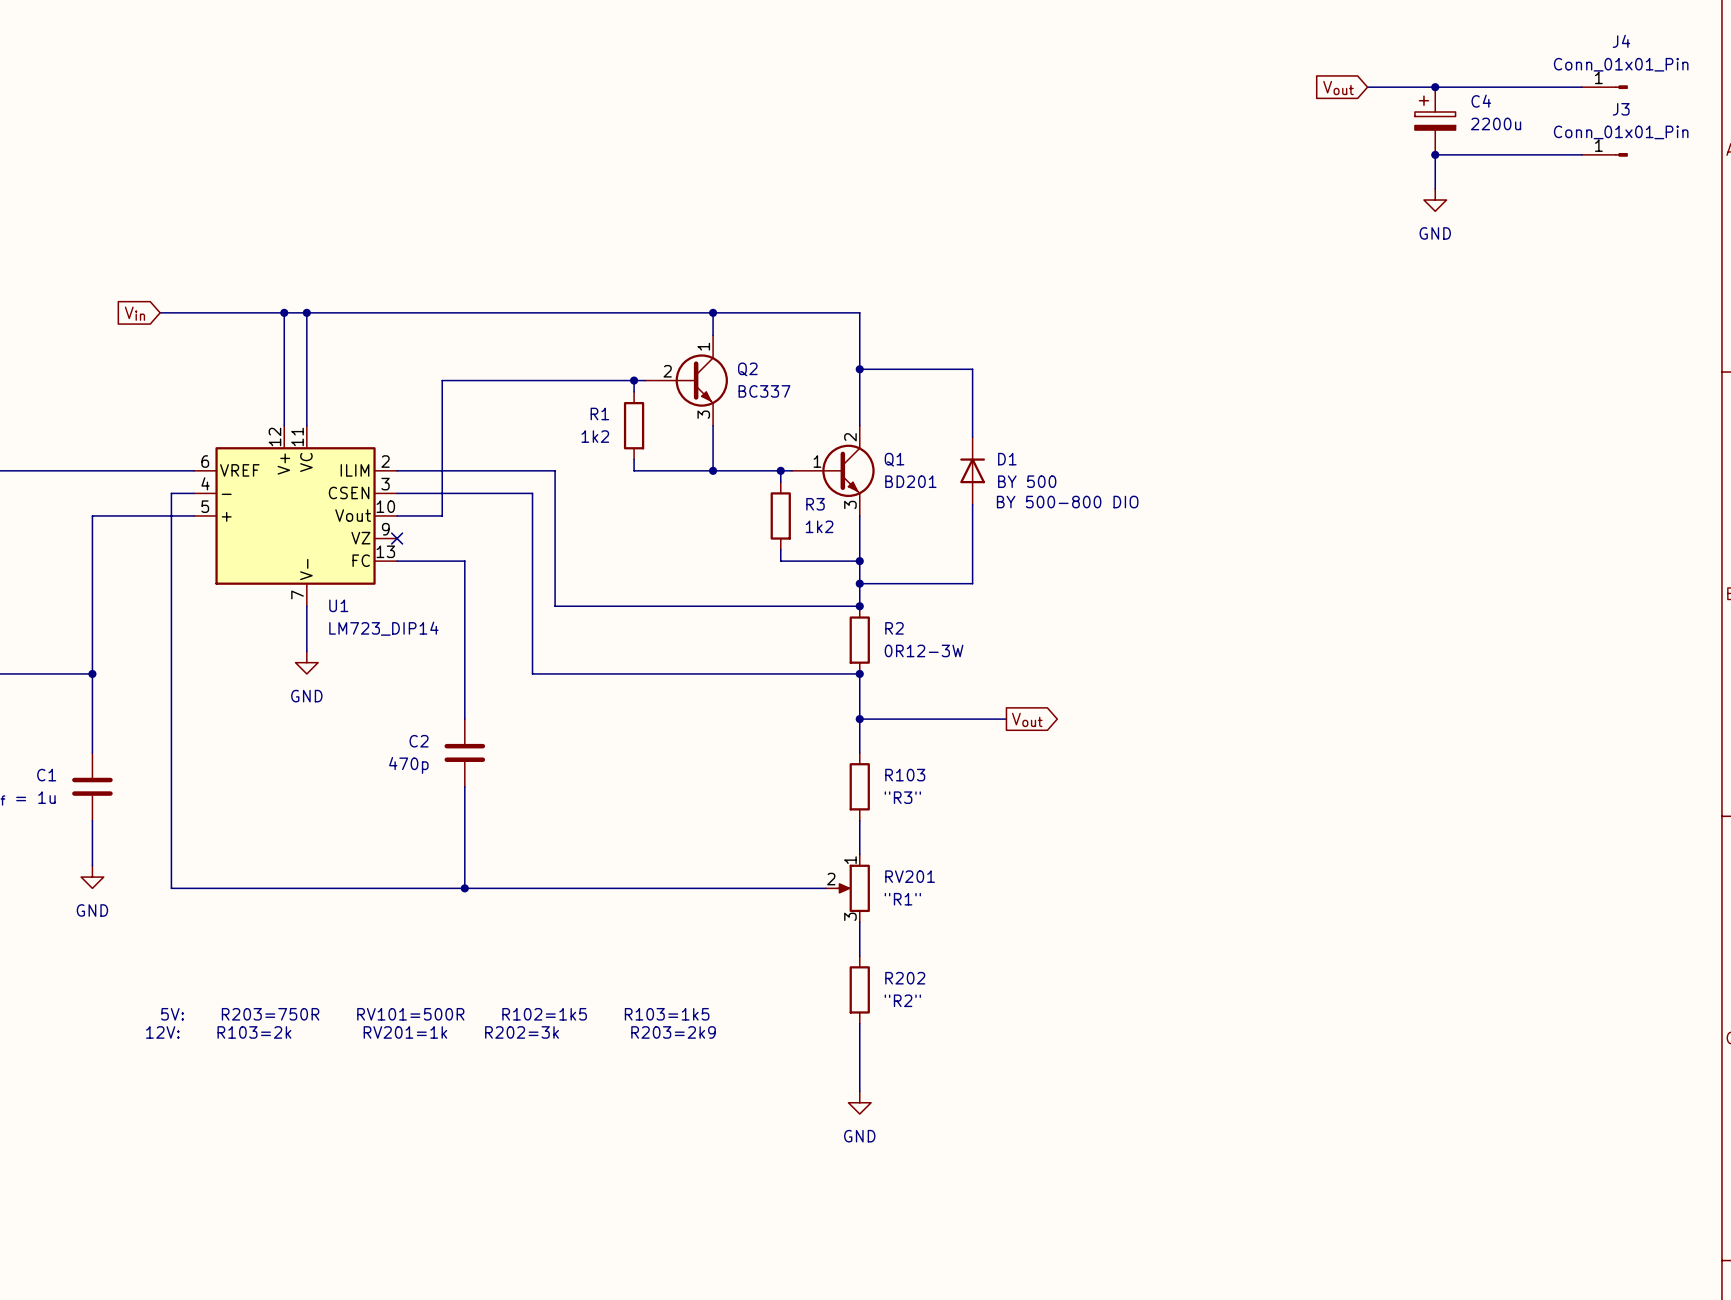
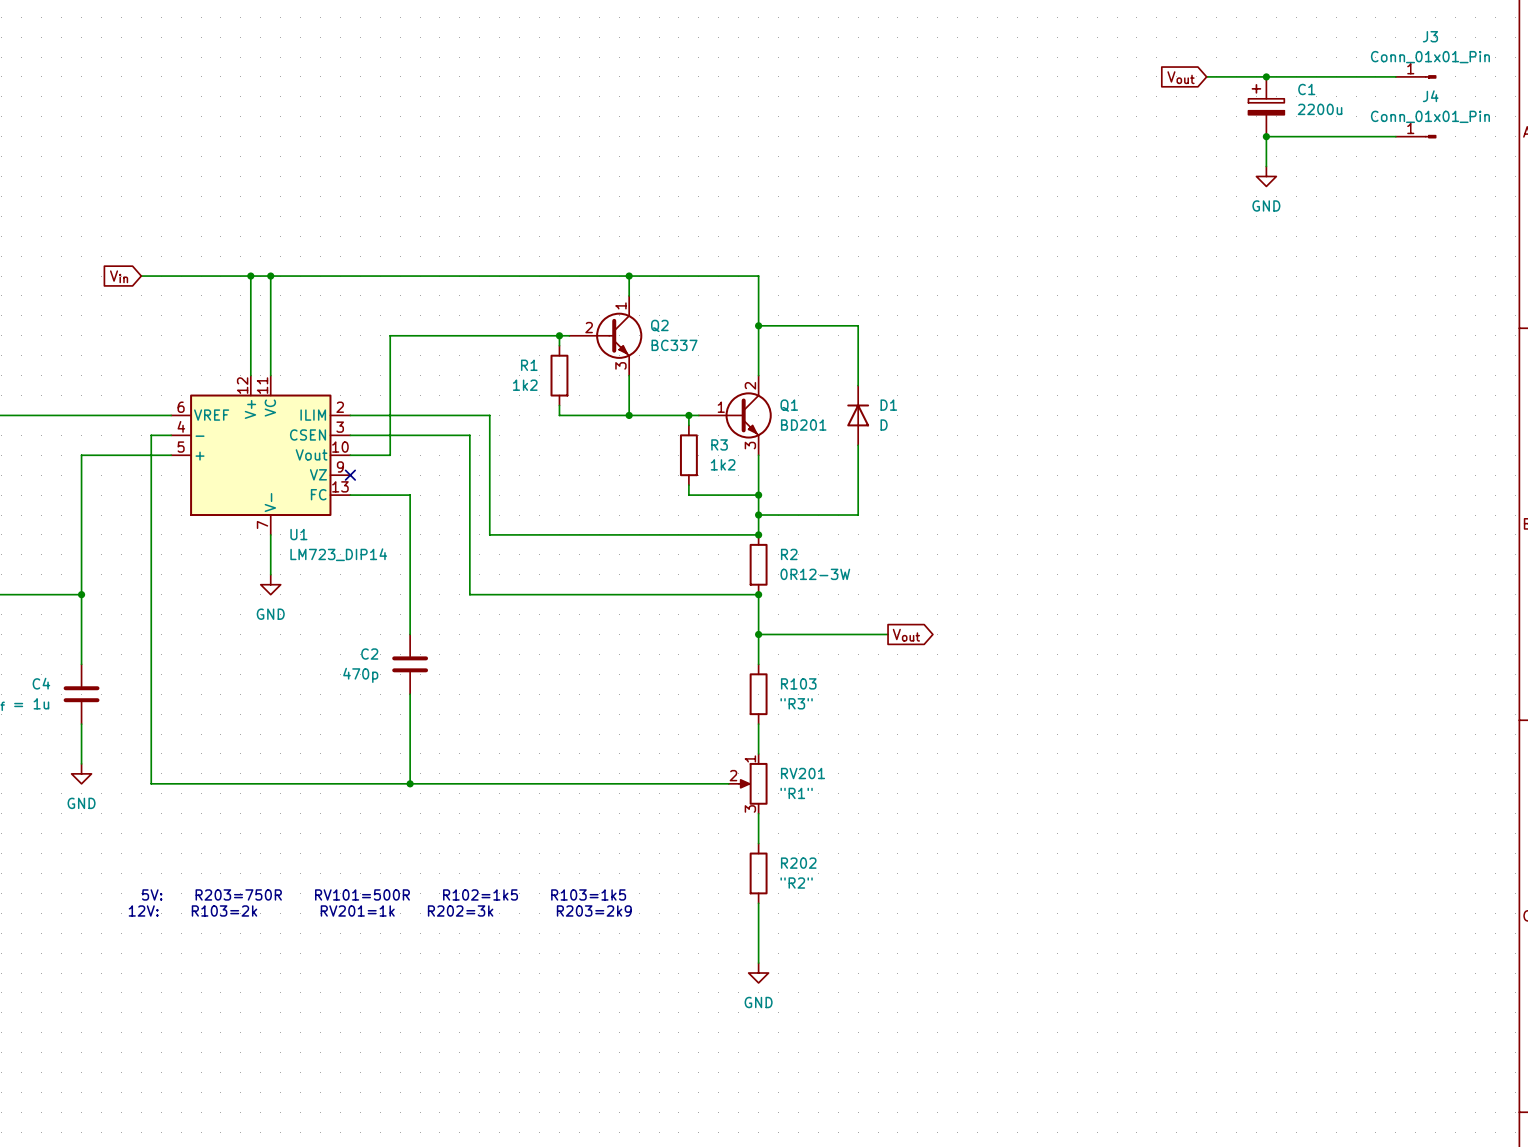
J4 name: J4 (1621, 41) -> J3 (1430, 36)
C4 name: C4 (1481, 101) -> C1 (1306, 89)
J3 name: J3 (1621, 109) -> J4 (1430, 96)
D1 value: BY 500 (1027, 481) -> D (884, 425)
text: BY 500-800 DIO (1067, 502) -> none
C1 name: C1 (46, 775) -> C4 (41, 683)

